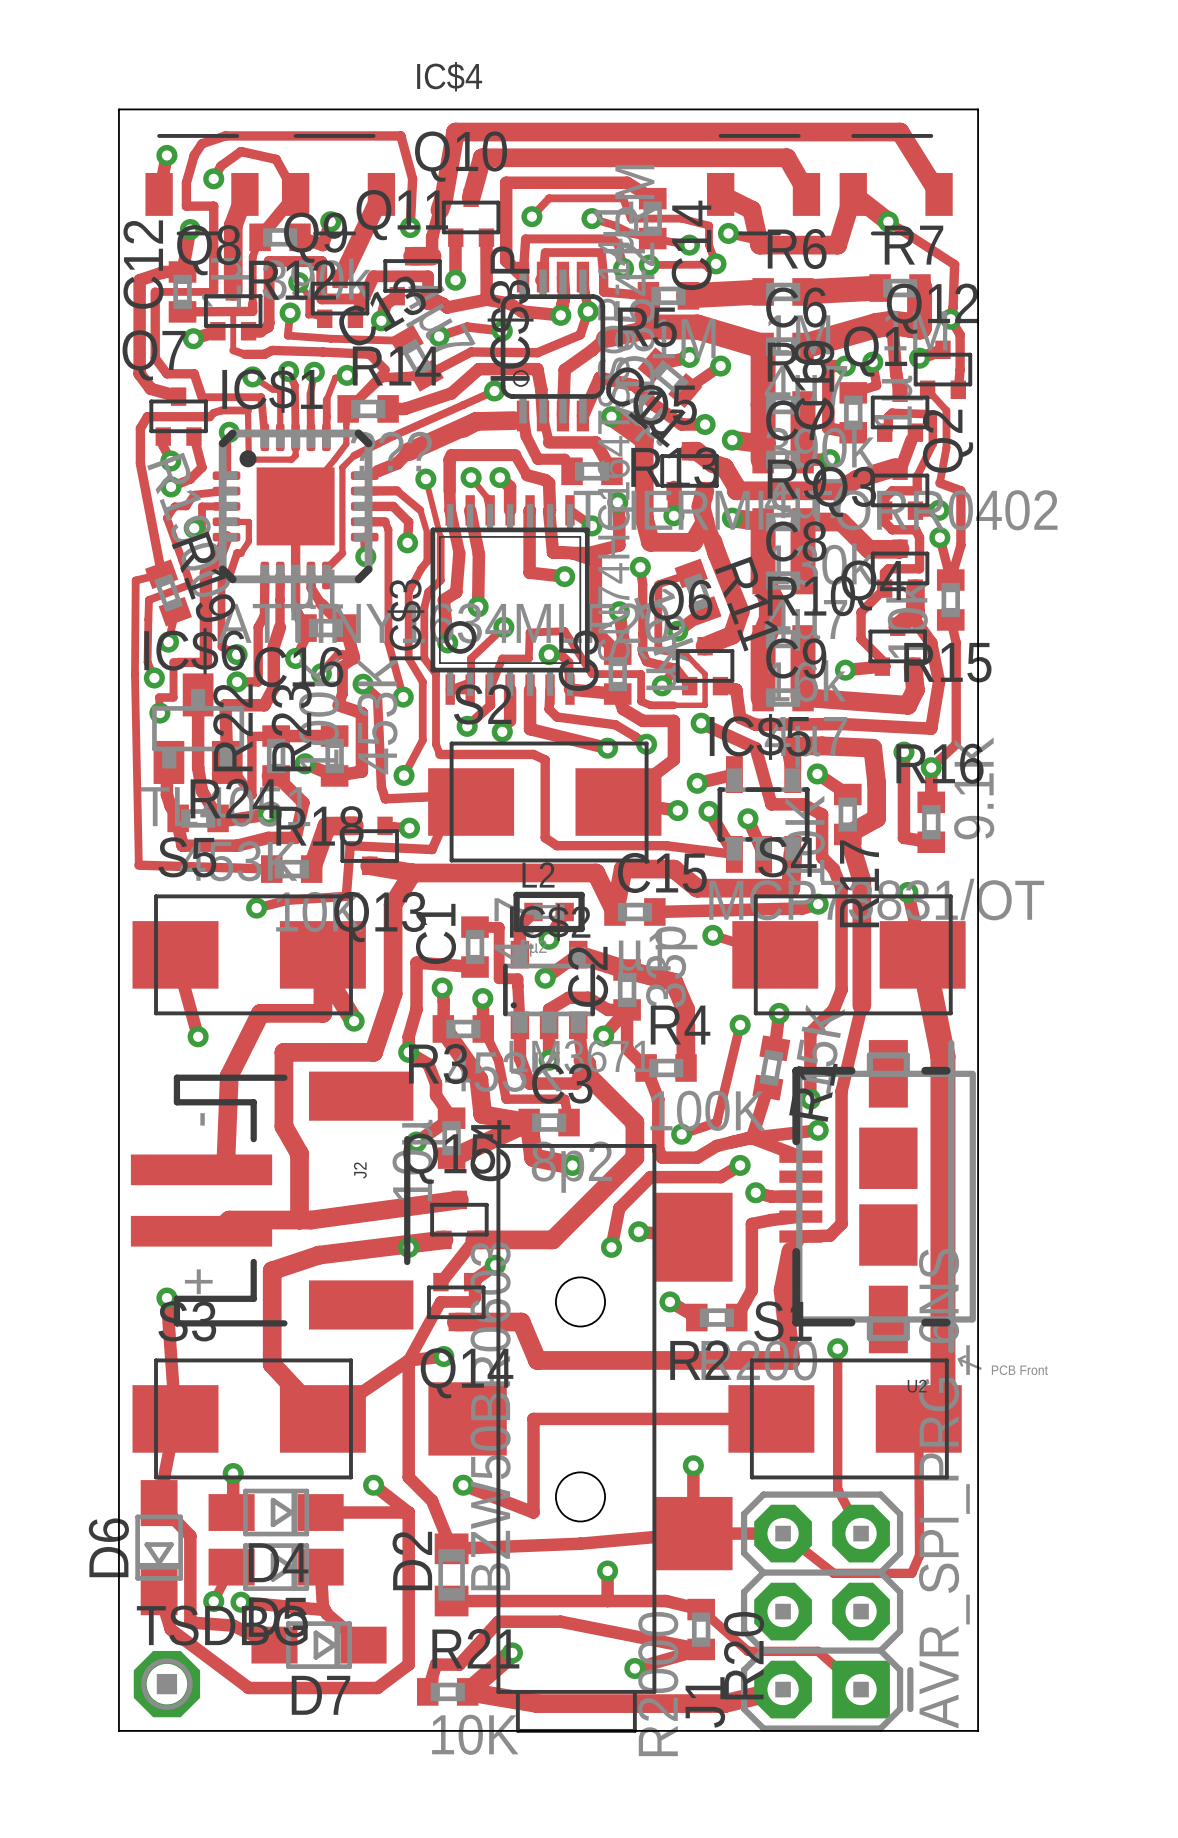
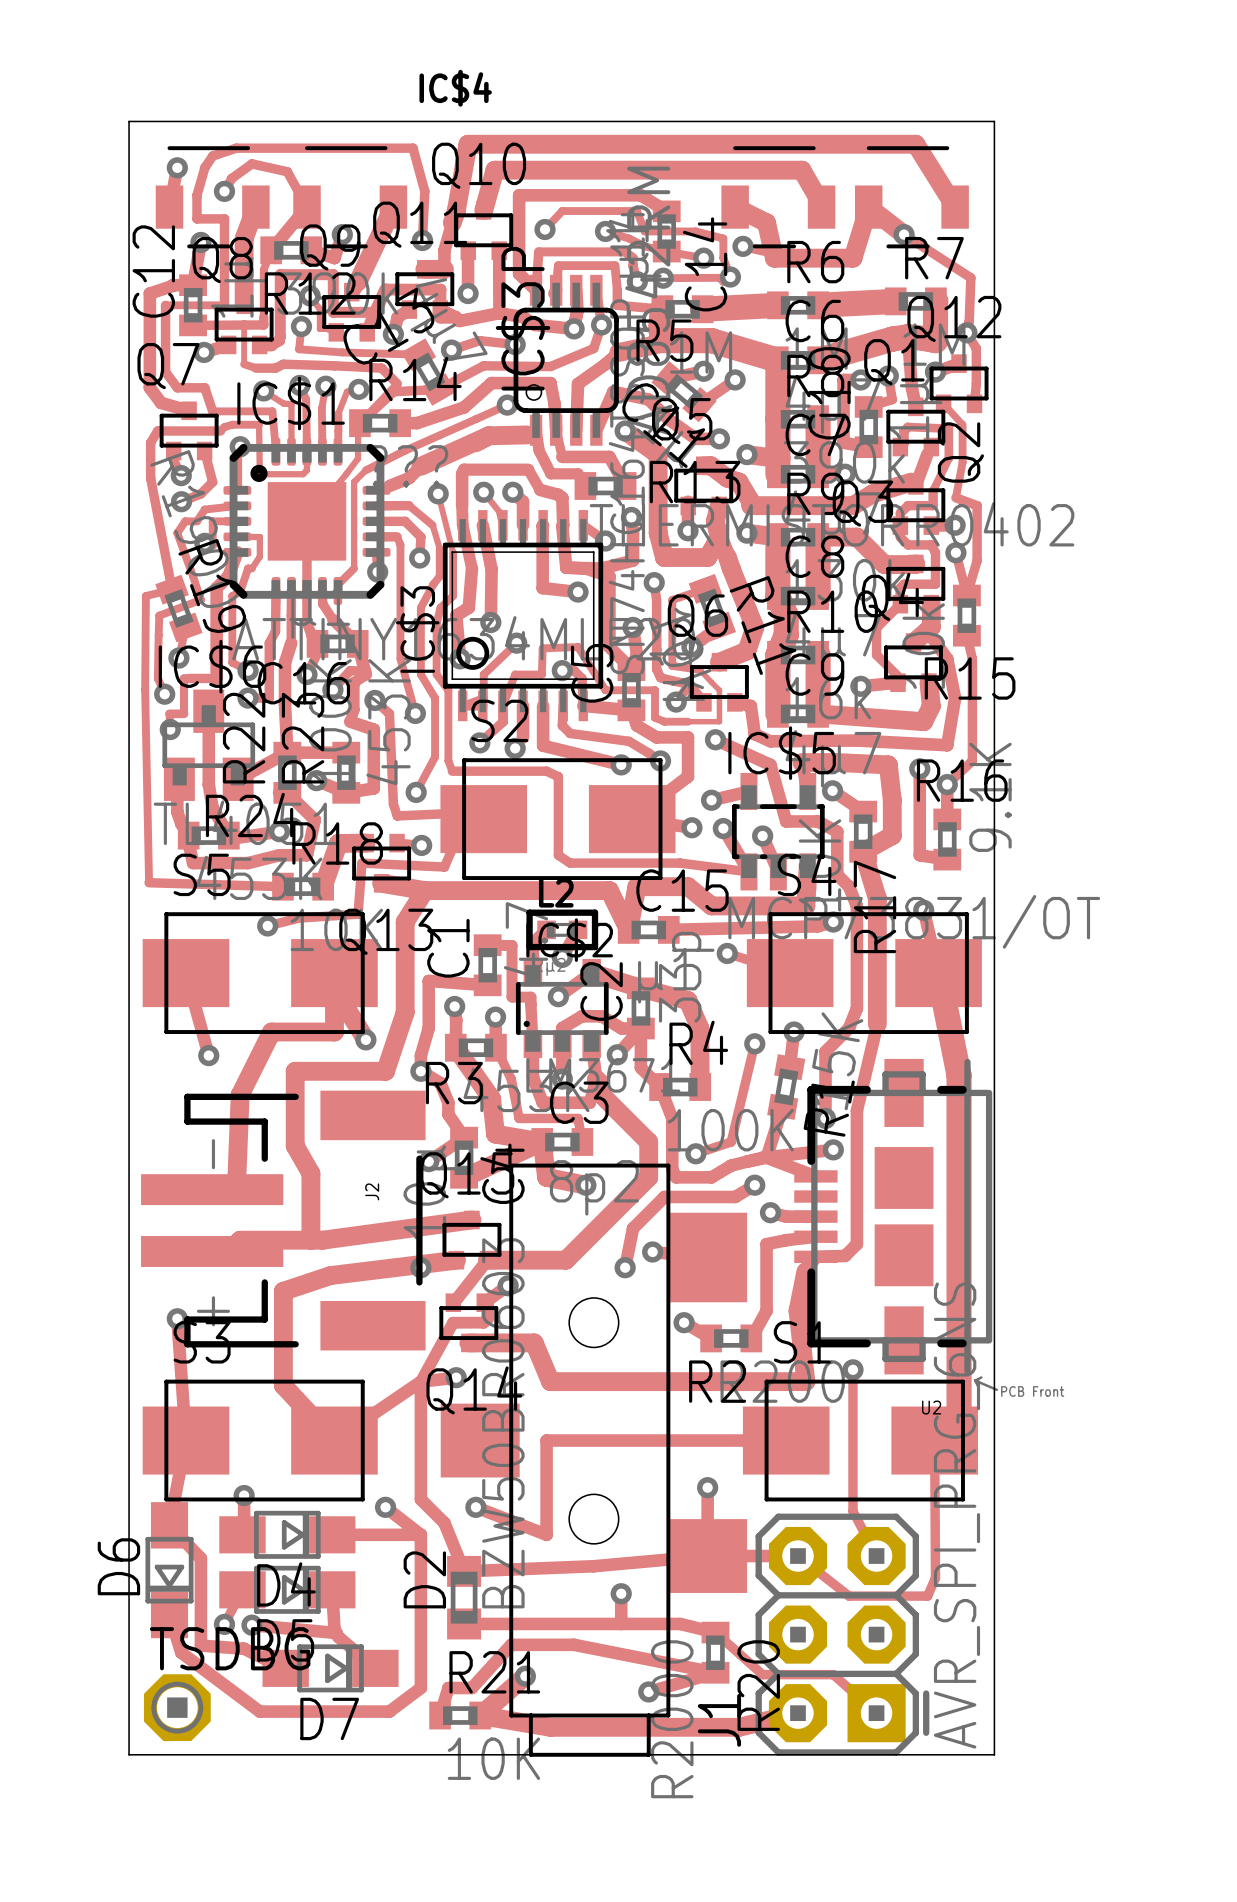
track: (273, 687) (264, 705) (225, 705) (227, 762) (251, 794) (251, 736) (276, 736) -> (284, 704) (287, 752) (238, 779)

